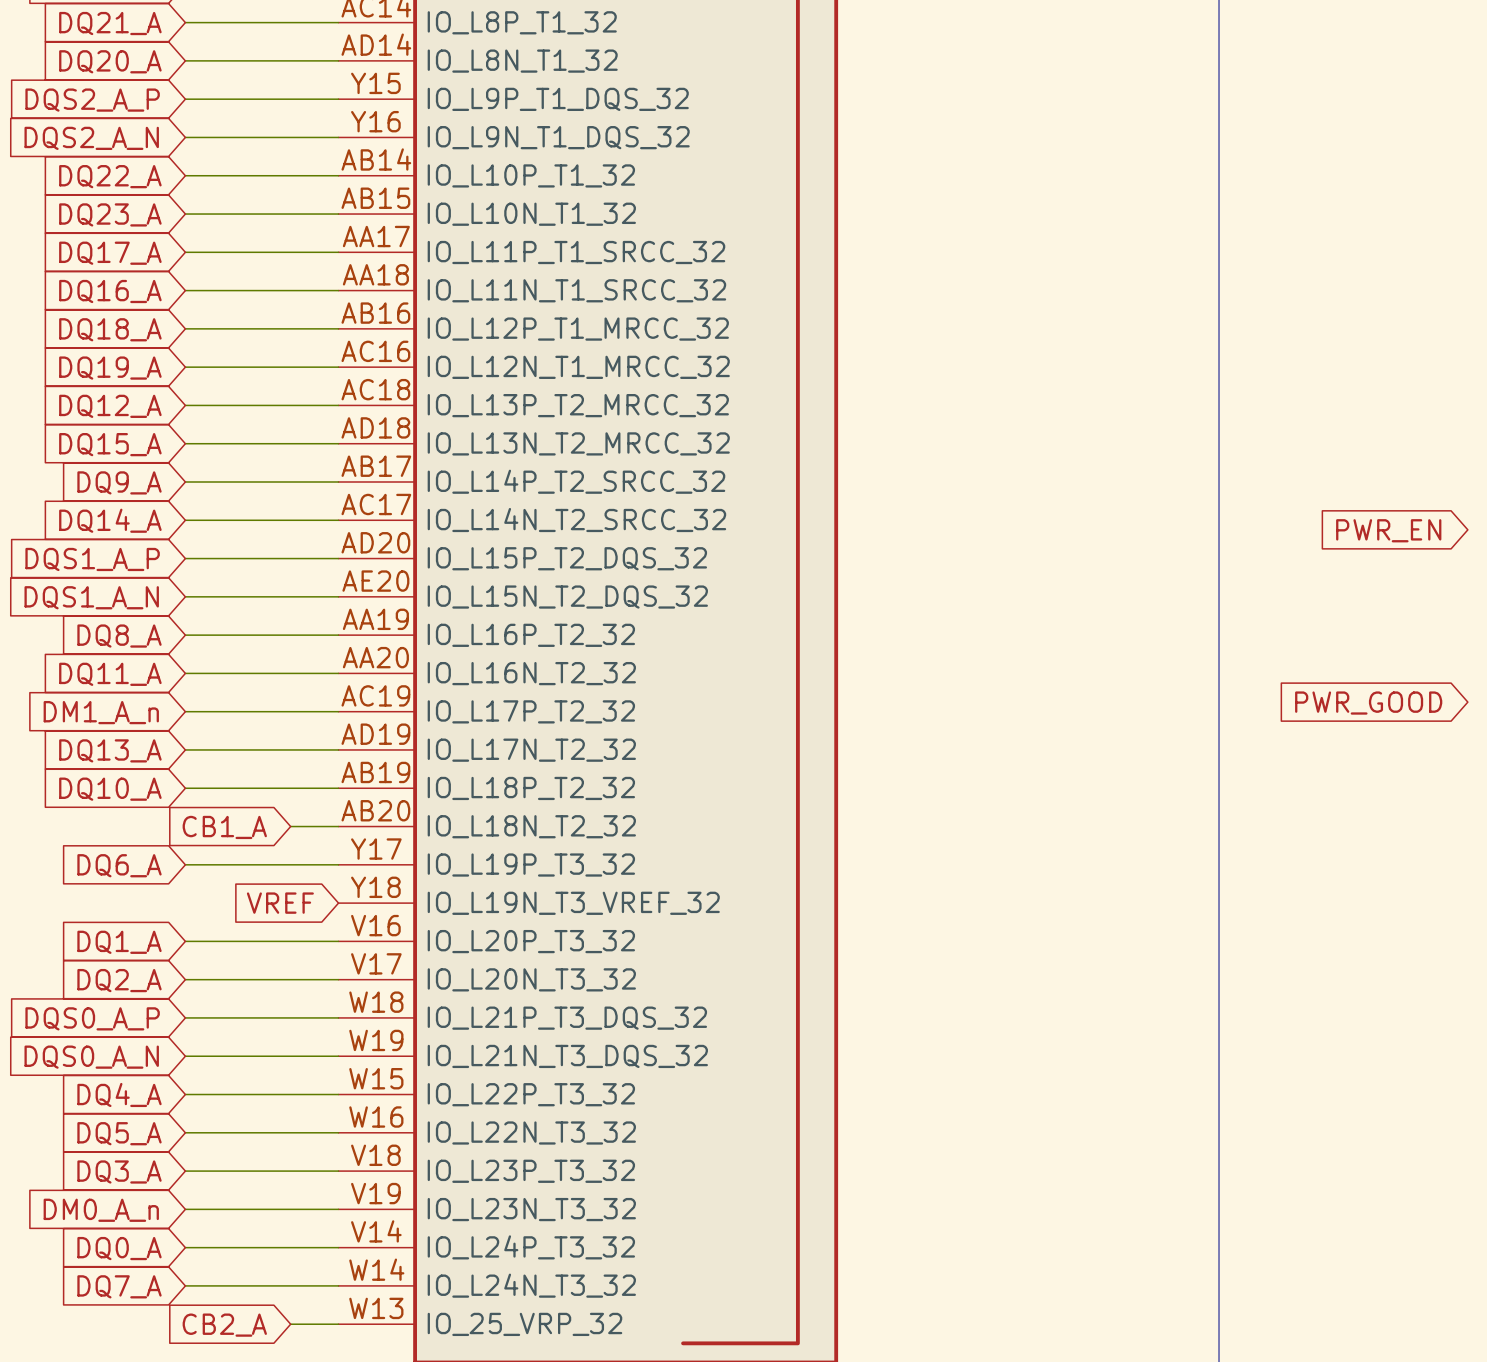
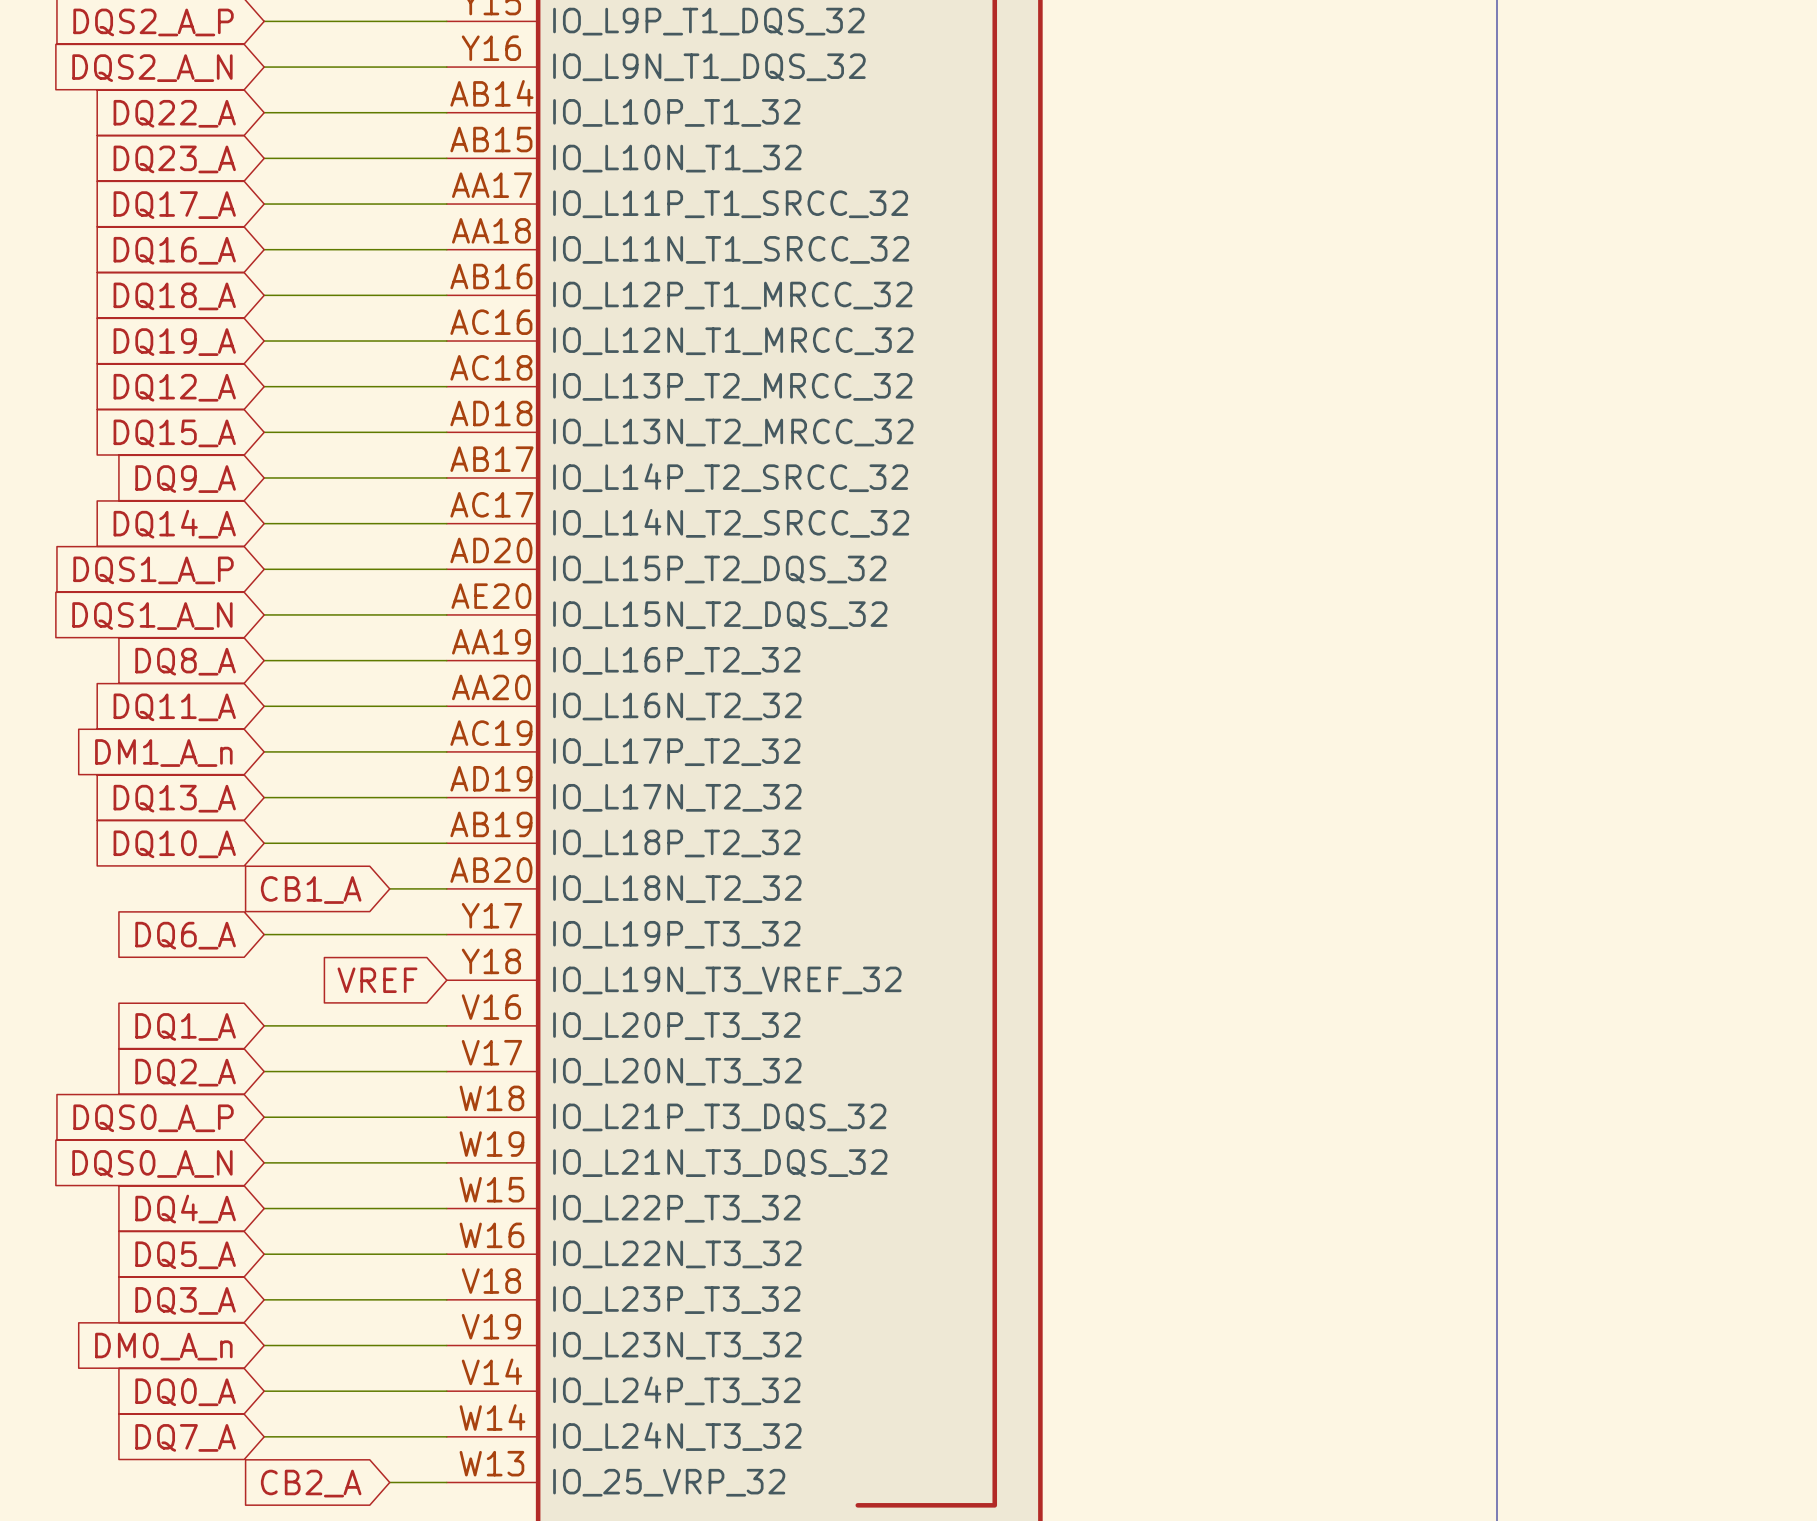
global label: PWR_EN (1388, 530) -> none
global label: PWR_GOOD (1368, 703) -> none

